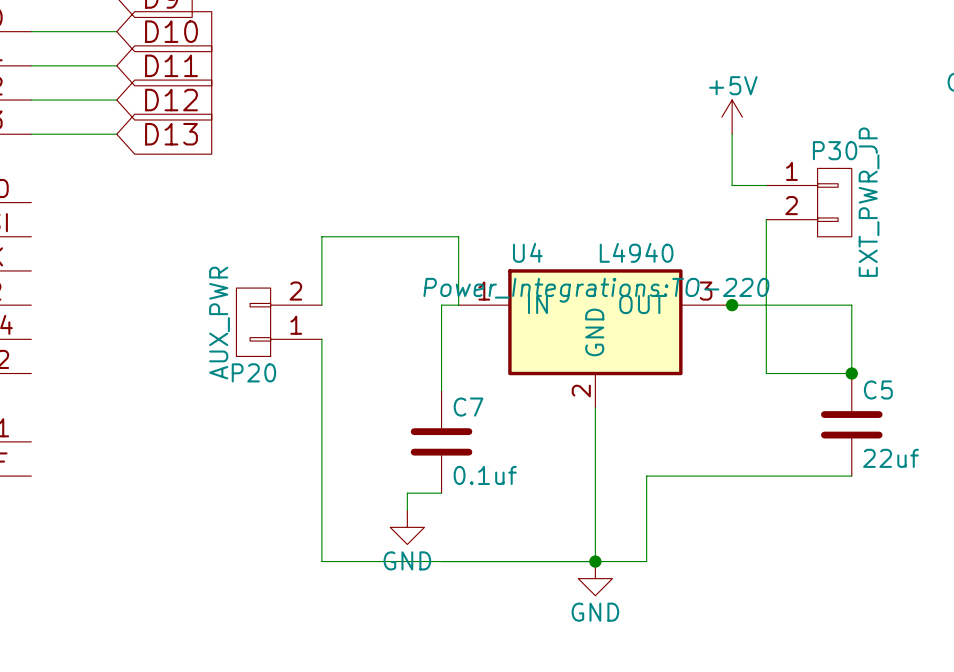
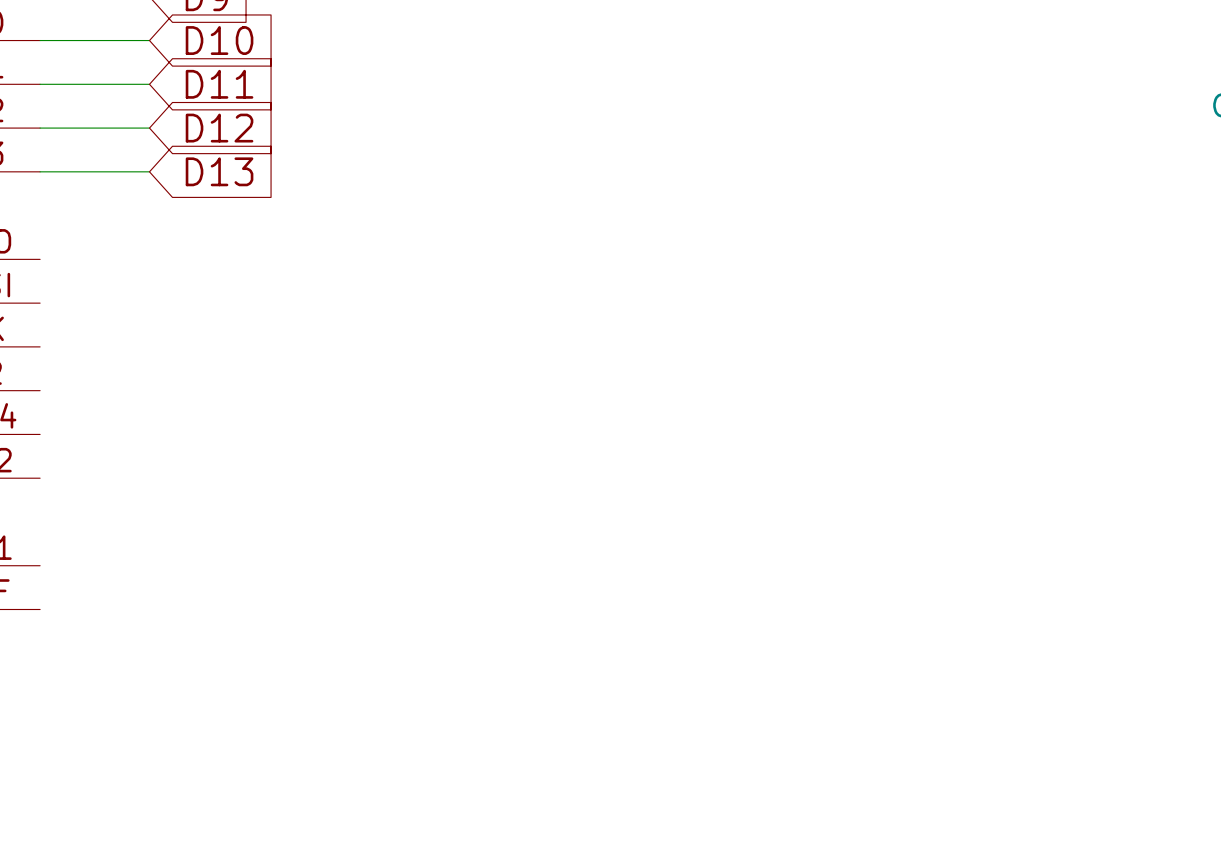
power symbol: +5V (732, 117) -> none
wire: (732, 134) (732, 185) (766, 185) -> none
P30: EXT_PWR_JP (809, 202) -> none
wire: (766, 219) (766, 373) (851, 373) (851, 305) (732, 305) -> none
wire: (321, 305) (321, 236) (458, 236) (458, 305) (441, 305) (441, 390) -> none
junction: (732, 305) -> none
P20: AUX_PWR (279, 322) -> none
U4: L4940 (595, 338) -> none
wire: (321, 339) (321, 561) (646, 561) (646, 476) (851, 476) -> none
junction: (851, 373) -> none
wire: (595, 407) (595, 561) -> none
C5: 22uf (851, 424) -> none
C7: 0.1uf (441, 441) -> none
wire: (441, 493) (407, 493) (407, 510) -> none
power symbol: GND (407, 527) -> none
junction: (595, 561) -> none
power symbol: GND (595, 578) -> none

